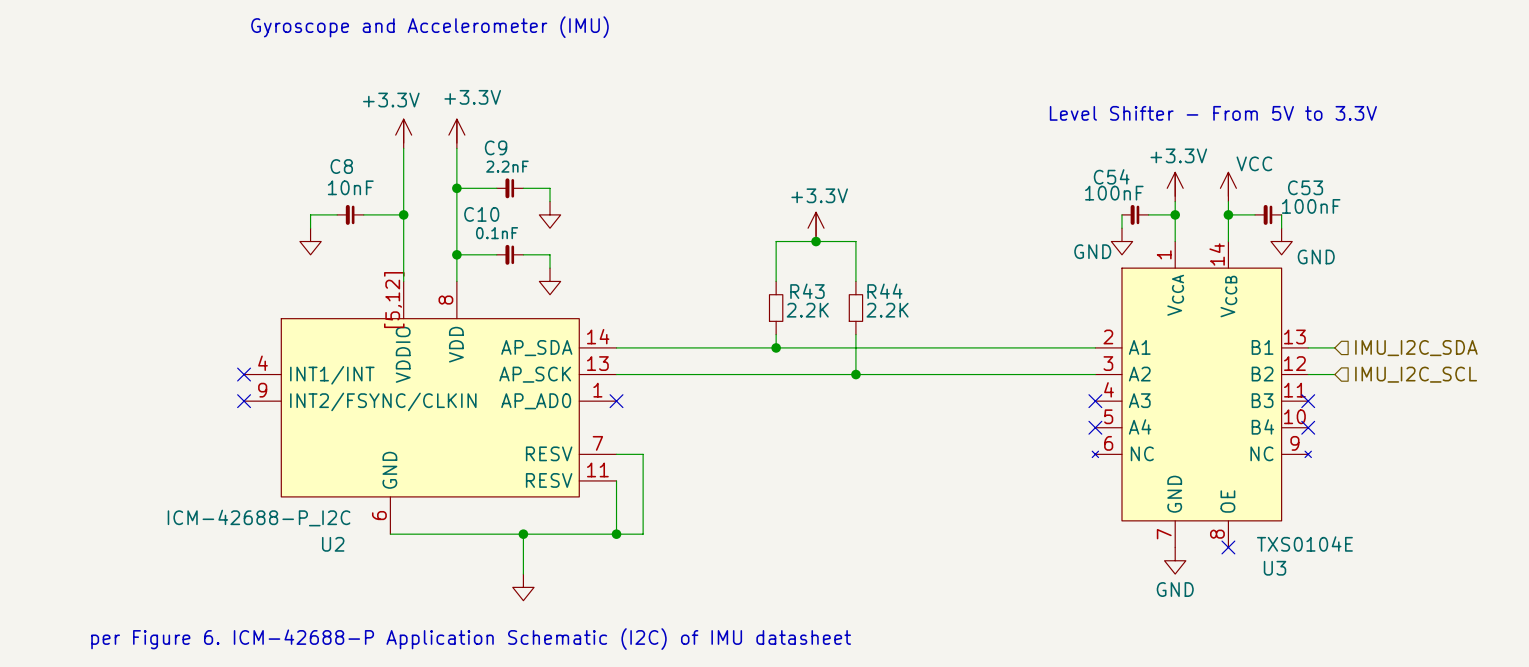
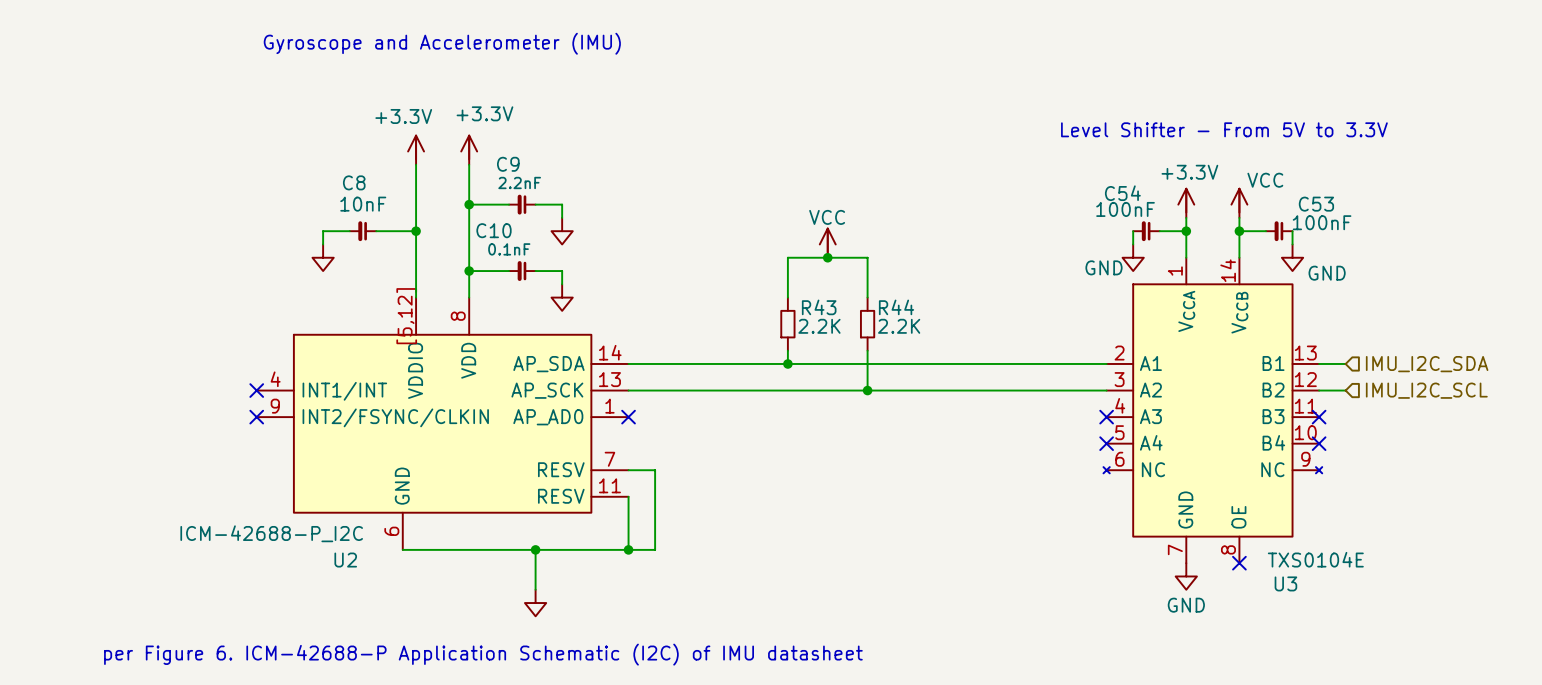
power symbol: +3.3V (816, 226) -> VCC (827, 243)

